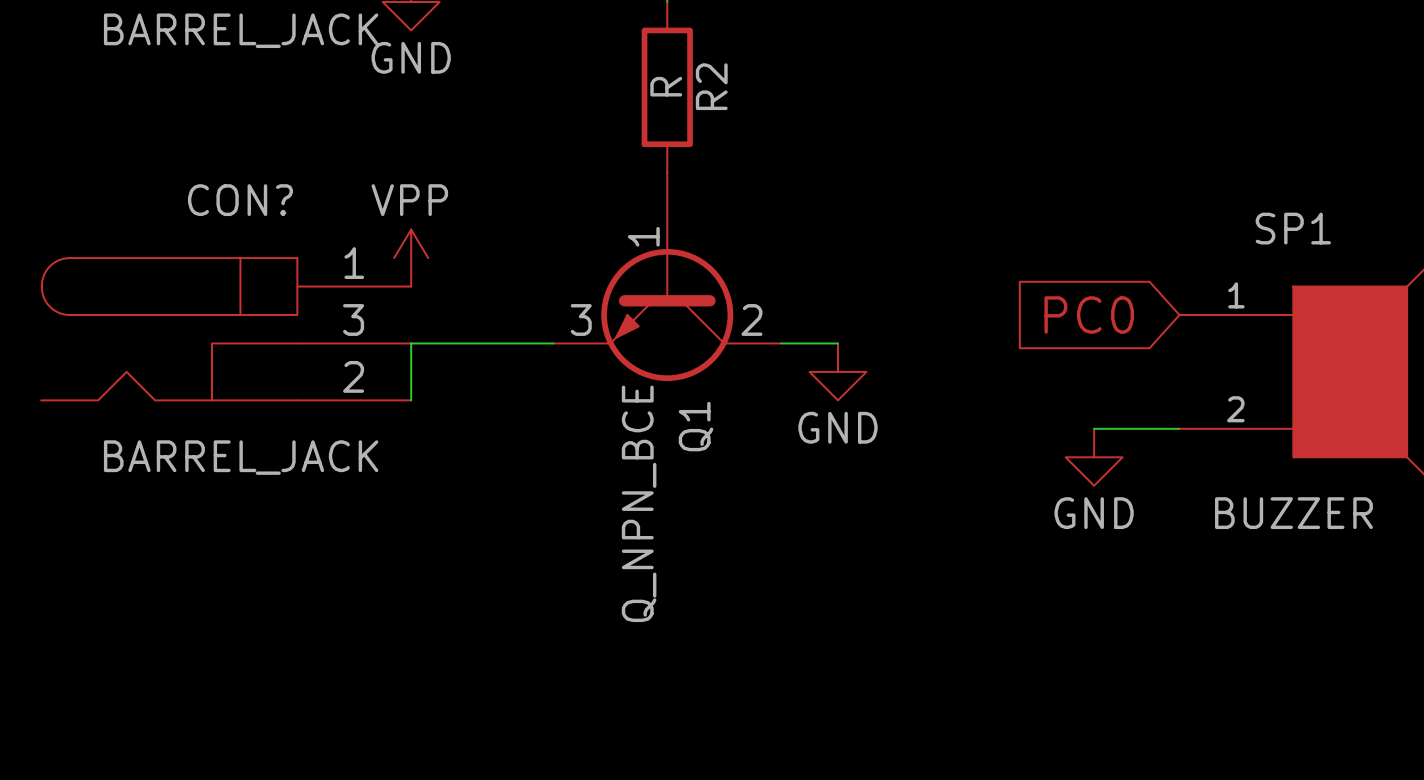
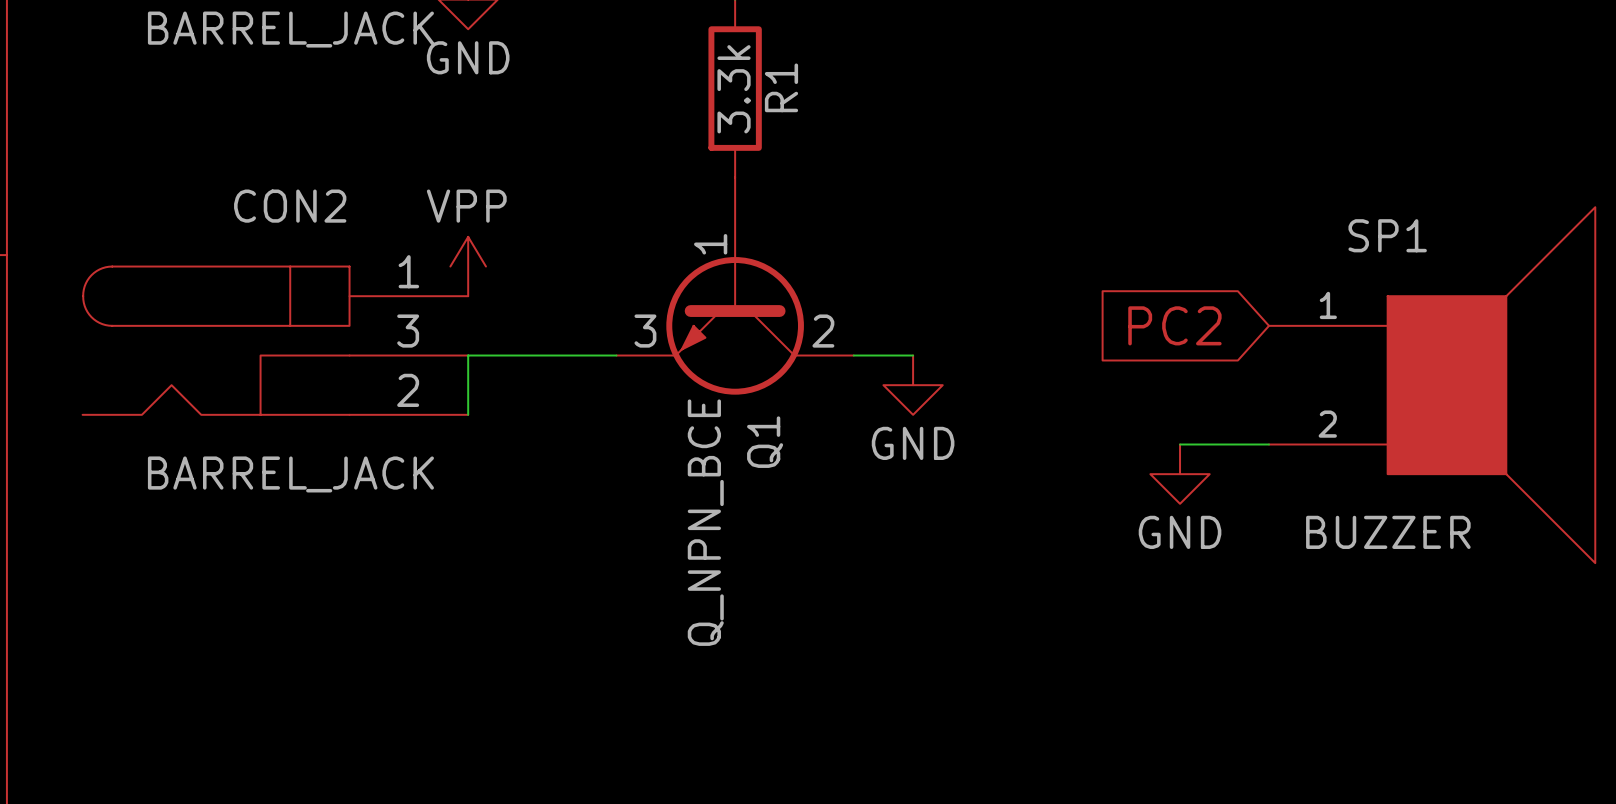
R2 value: R (666, 86) -> 3.3k (734, 89)
R2 name: R2 (711, 86) -> R1 (781, 87)
CON? name: CON? (240, 200) -> CON2 (290, 206)
global label: PC0 (1089, 315) -> PC2 (1174, 325)

